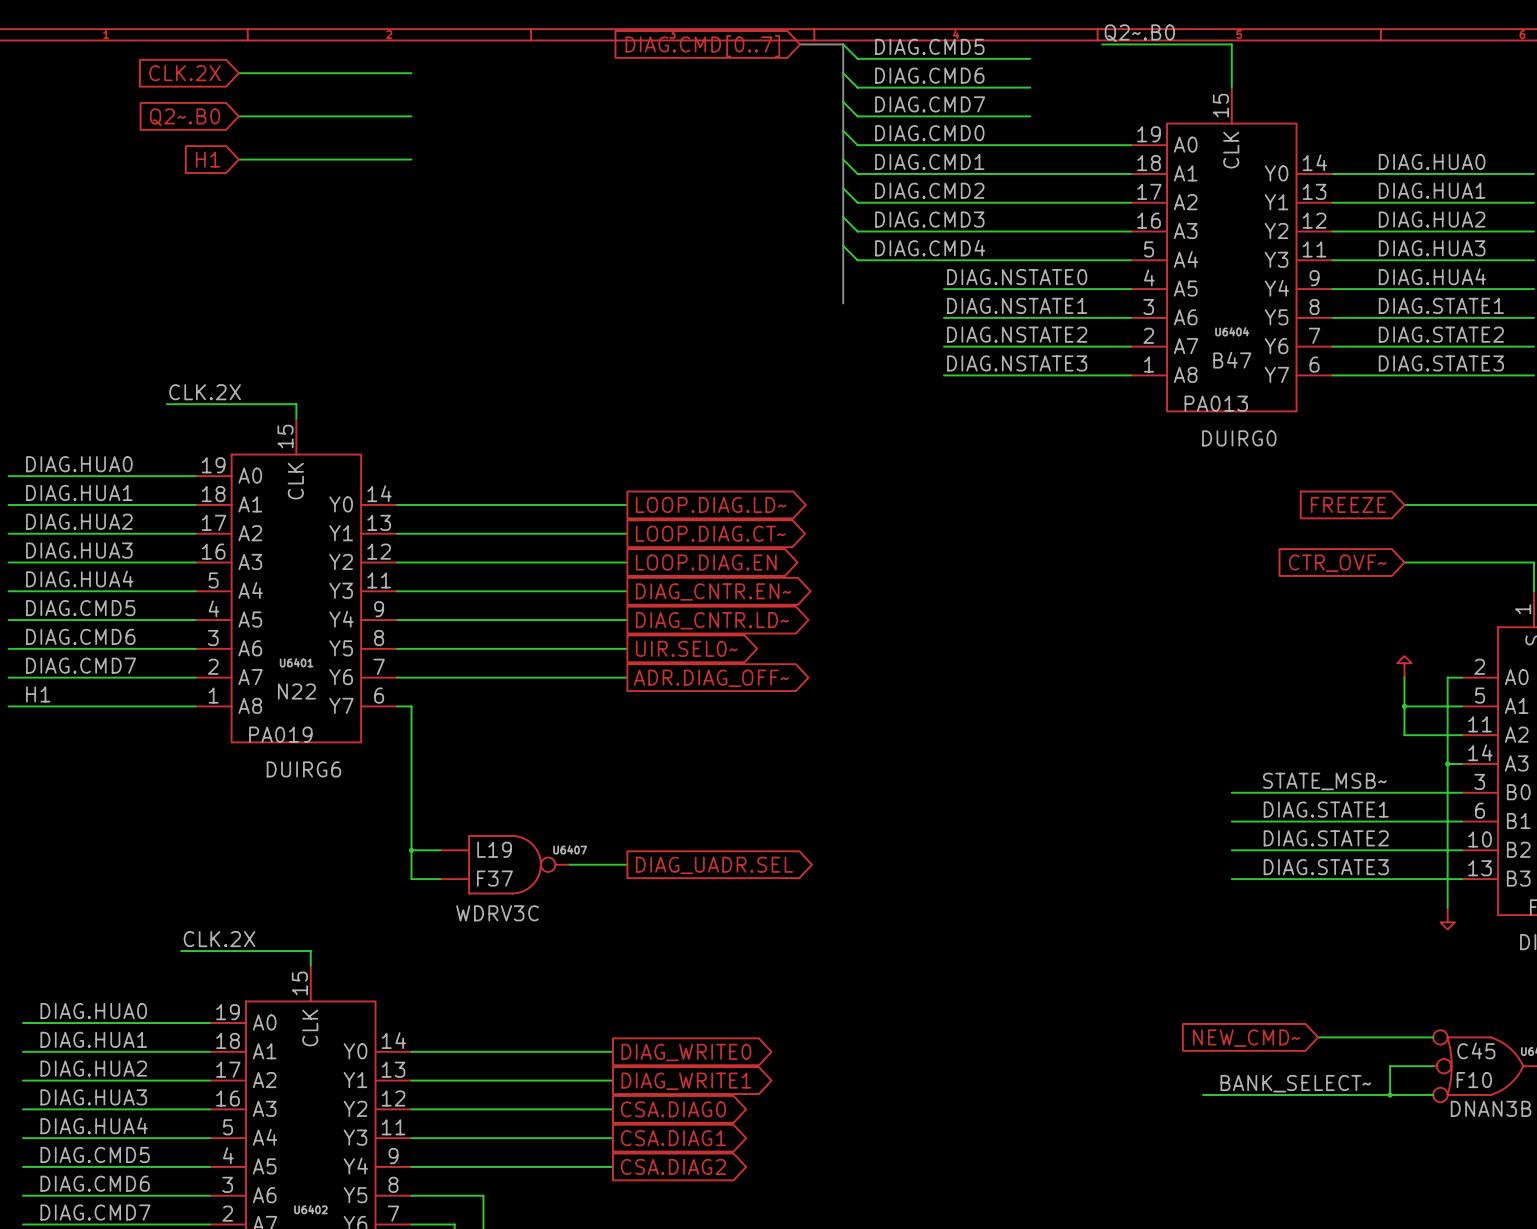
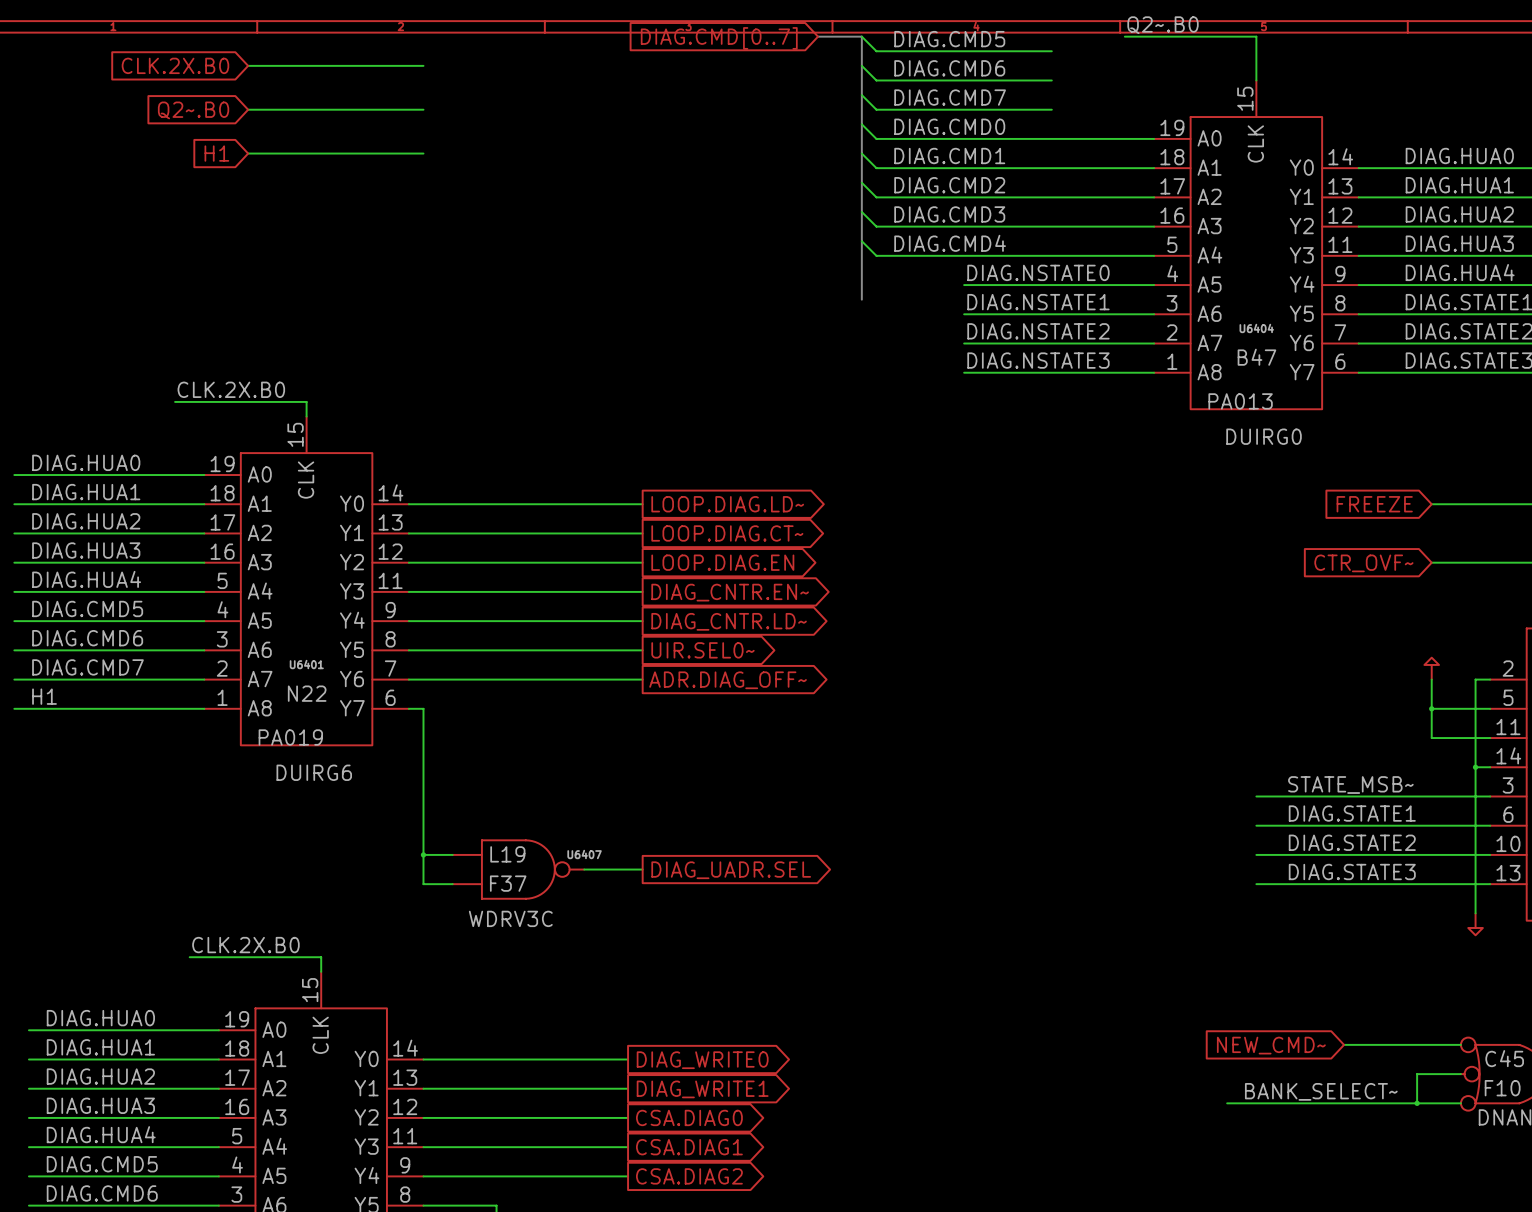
global label: CLK.2X (185, 73) -> CLK.2X.B0 (175, 65)
label: CLK.2X (205, 392) -> CLK.2X.B0 (231, 389)
label: CLK.2X (219, 939) -> CLK.2X.B0 (245, 945)

